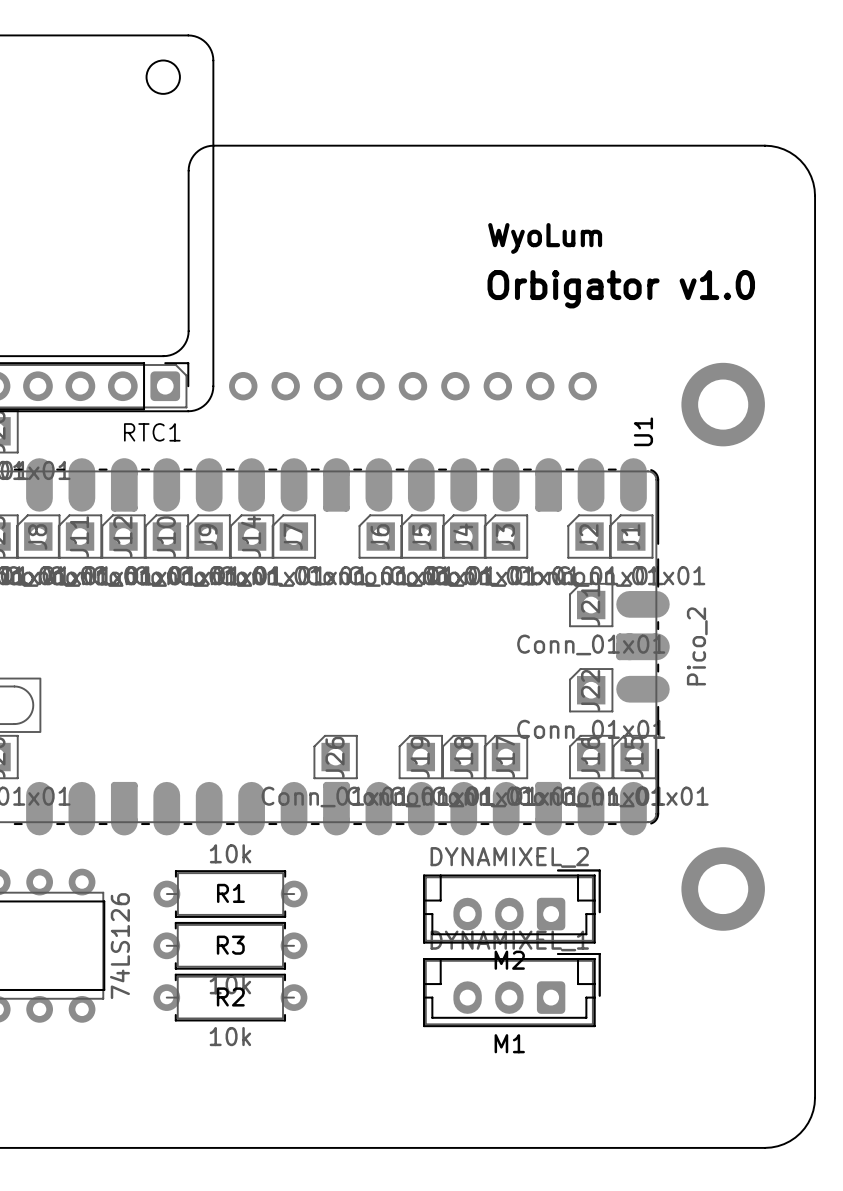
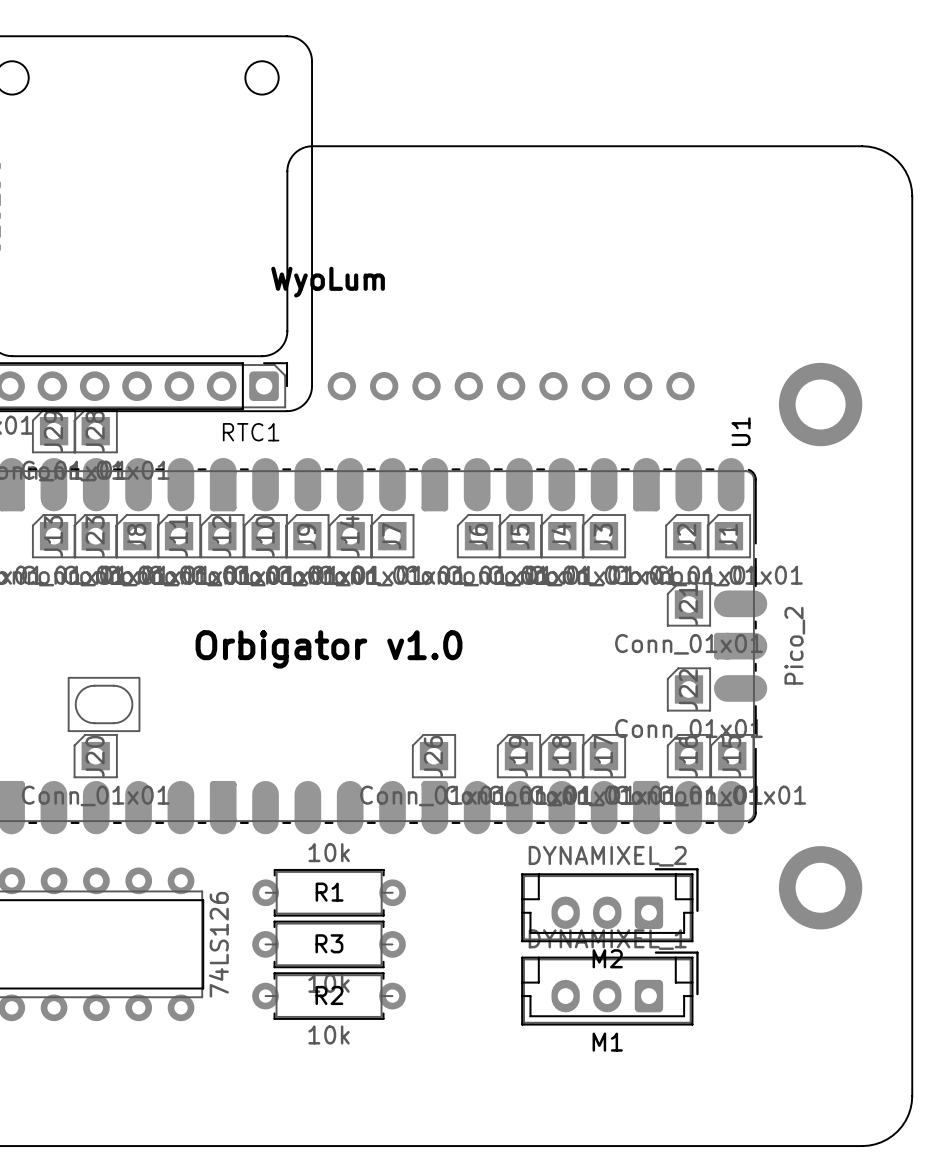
text position: WyoLum (545, 238) -> WyoLum (328, 282)
text: Orbigator v1.0 (621, 289) -> none
text: none -> Orbigator v1.0 (329, 649)

